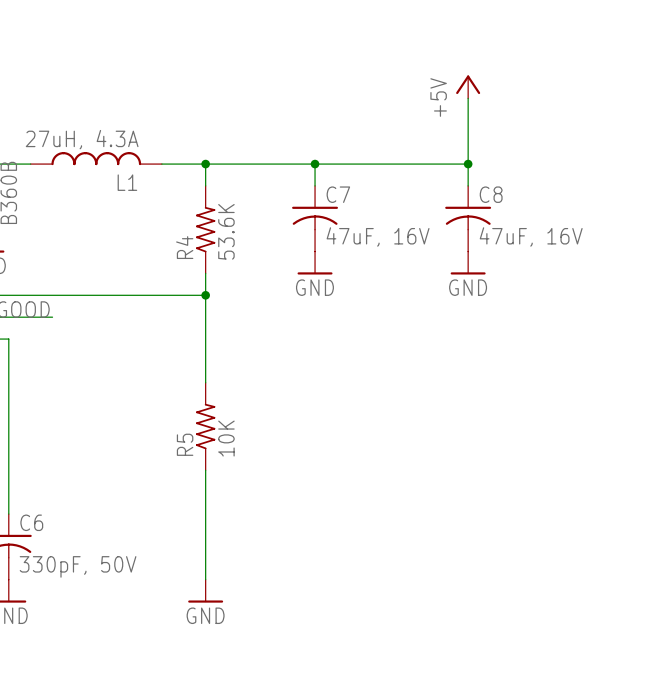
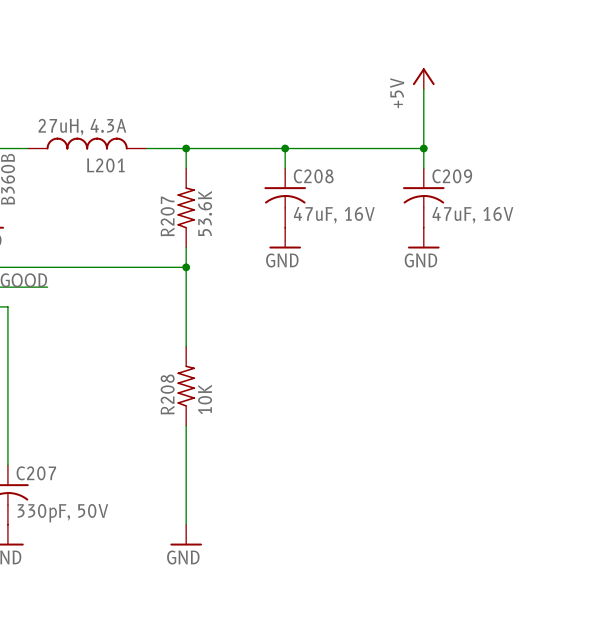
L1 name: L1 (127, 182) -> L201 (105, 165)
C7 name: C7 (338, 194) -> C208 (313, 176)
C8 name: C8 (491, 194) -> C209 (452, 176)
R4 name: R4 (184, 247) -> R207 (167, 216)
R5 name: R5 (185, 444) -> R208 (167, 394)
C6 name: C6 (31, 522) -> C207 (36, 473)

